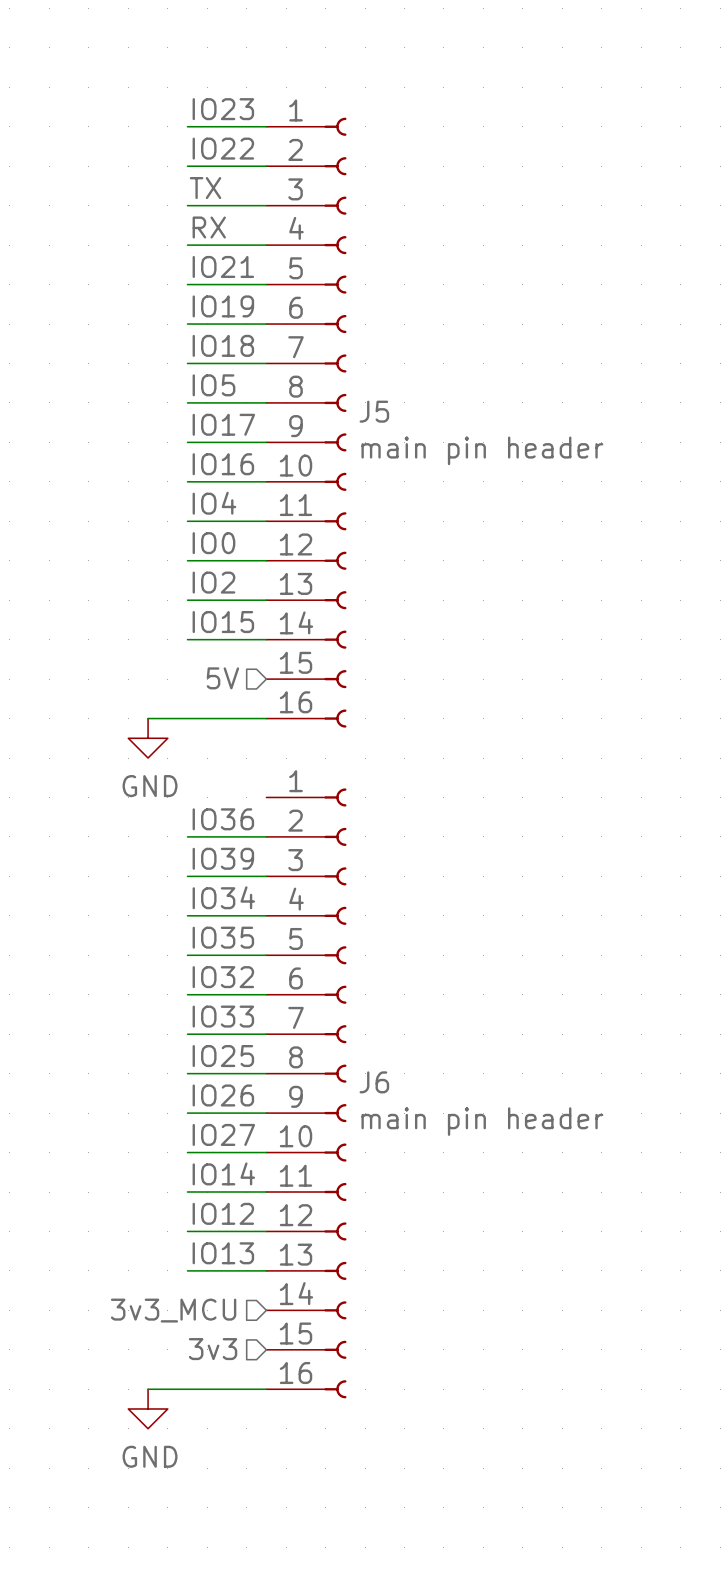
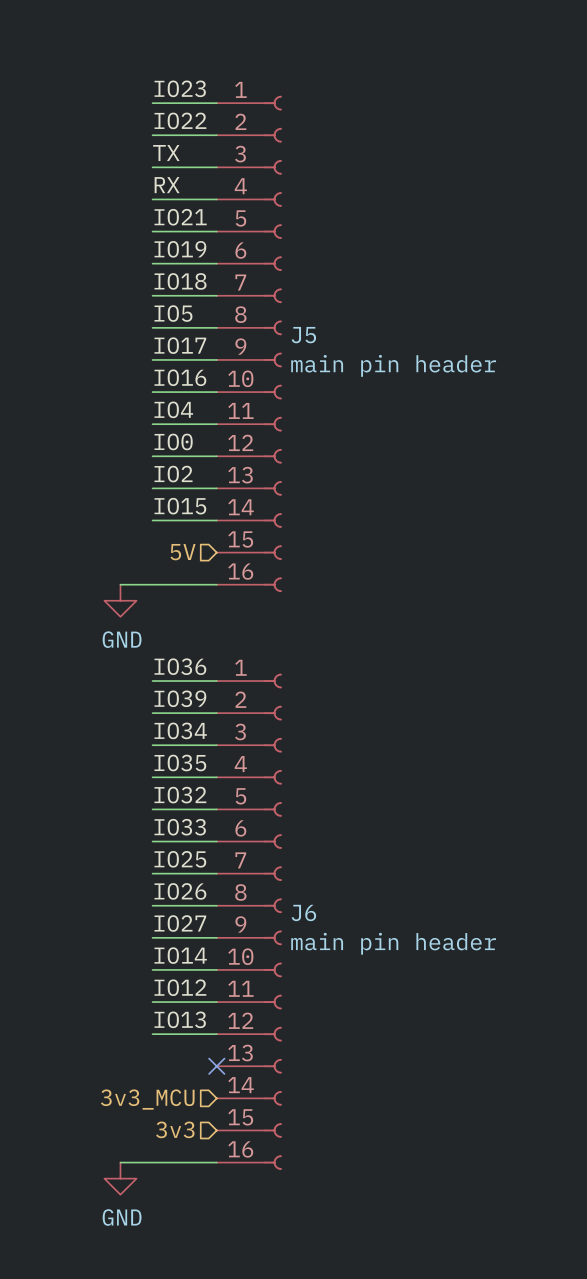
J6 position: (306, 1093) -> (249, 921)
hierarchical label: 3v3_MCU (173, 1310) -> none
no-connect mark: none -> (216, 1066)
hierarchical label: 3v3 (213, 1349) -> 3v3_MCU (147, 1099)
hierarchical label: none -> 3v3 (175, 1129)
wire: (148, 1389) (266, 1389) -> (120, 1162) (216, 1162)
power symbol position: GND (148, 1408) -> GND (120, 1178)

